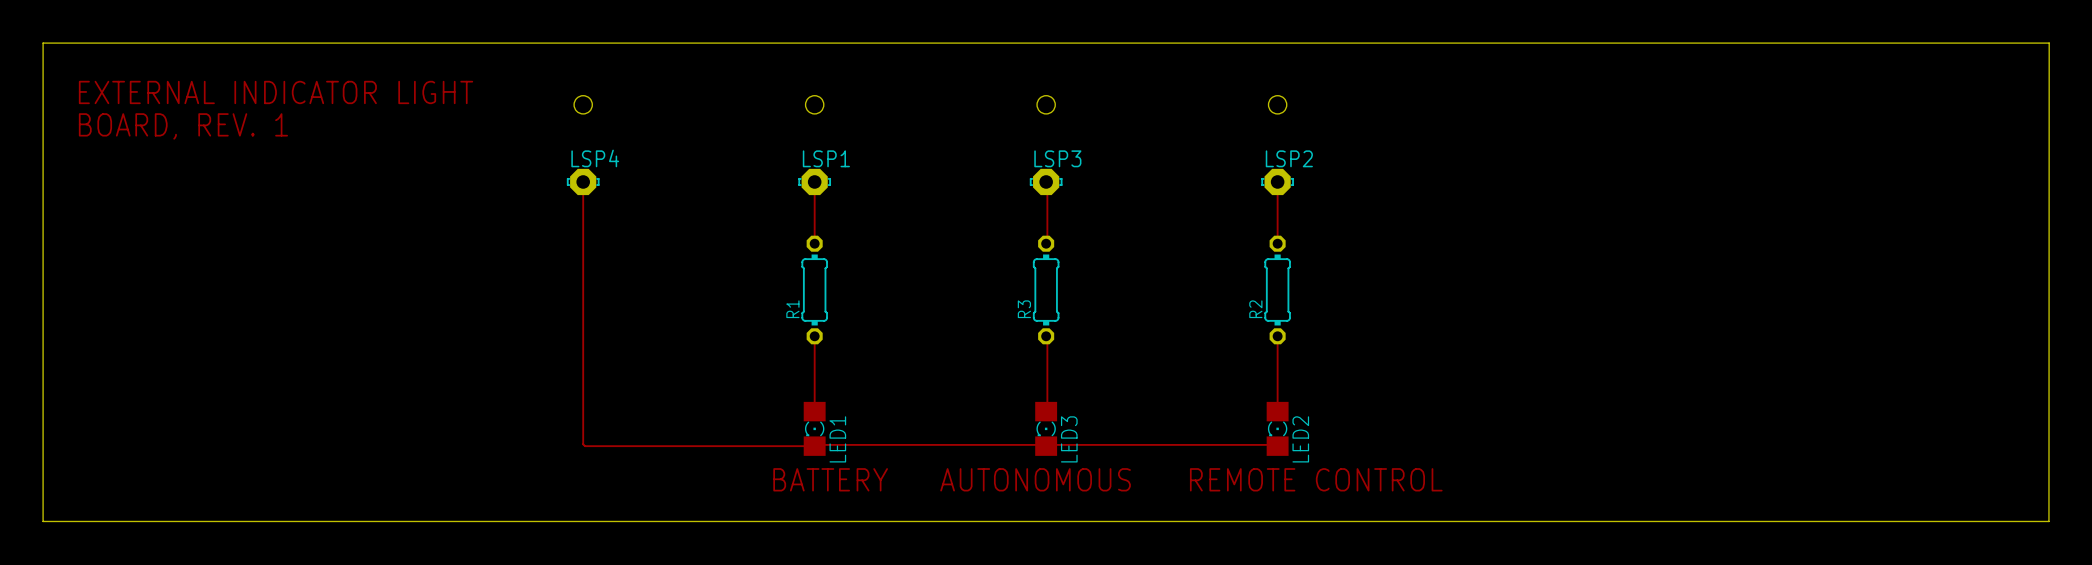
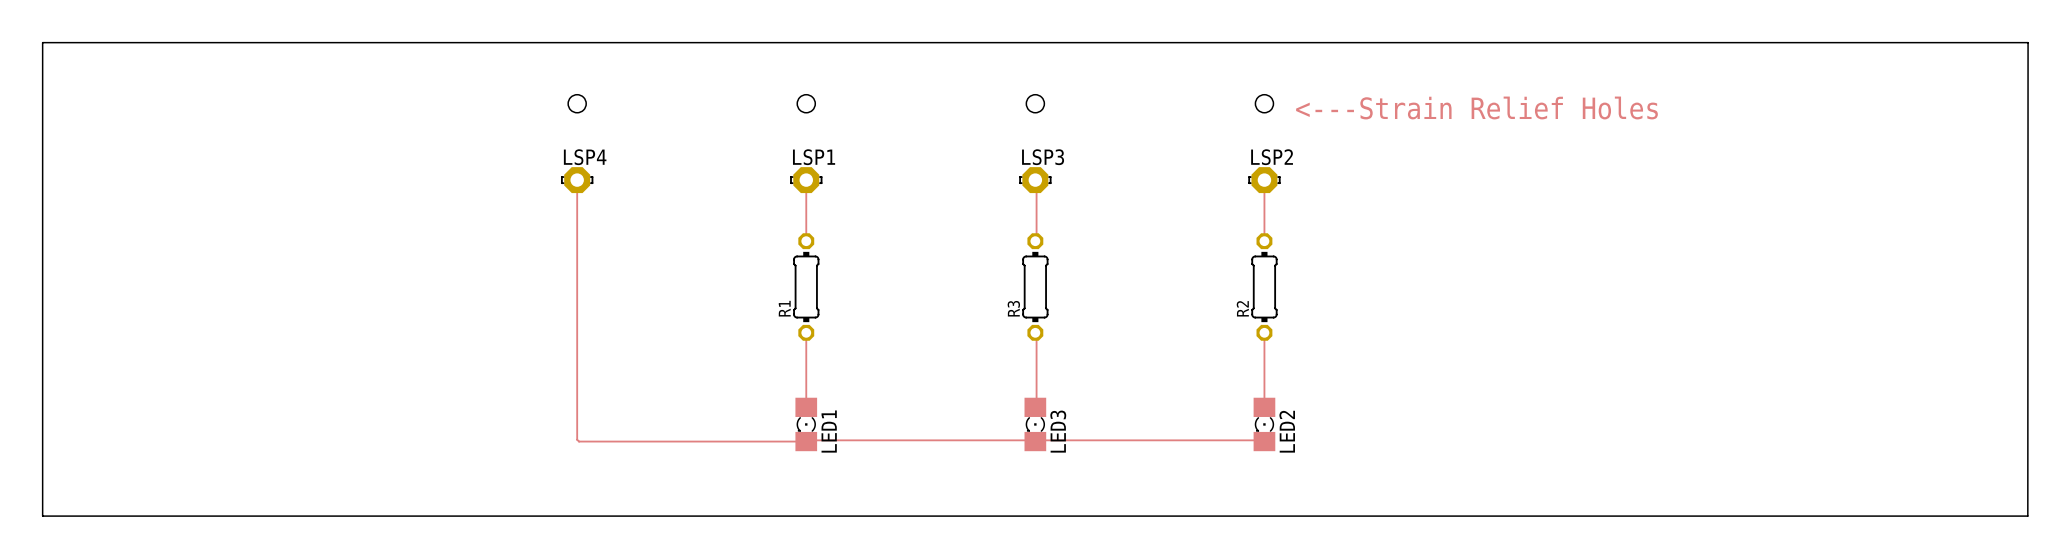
text: EXTERNAL INDICATOR LIGHT (276, 92) -> none
text: none -> <---Strain Relief Holes (1476, 107)
text: BOARD, REV. 1 (183, 126) -> none
text: BATTERY (830, 479) -> none
text: AUTONOMOUS (1035, 479) -> none
text: REMOTE CONTROL (1316, 479) -> none

